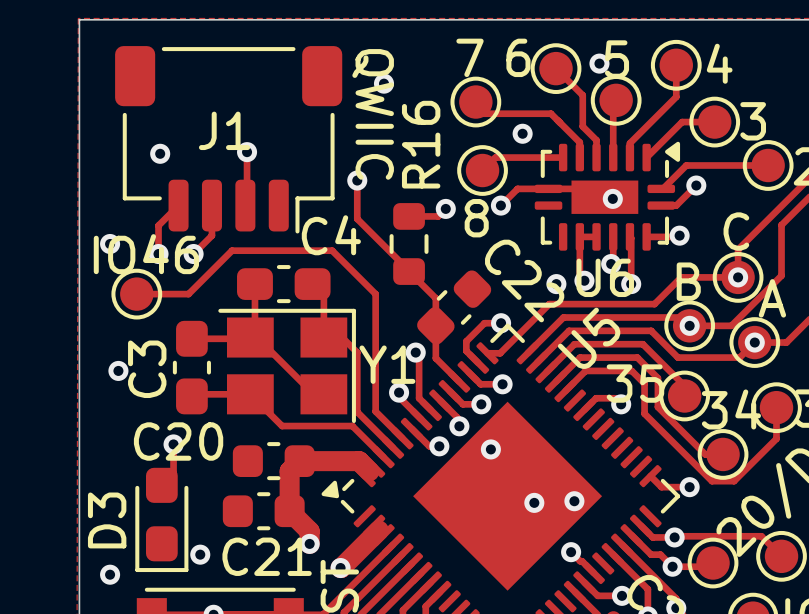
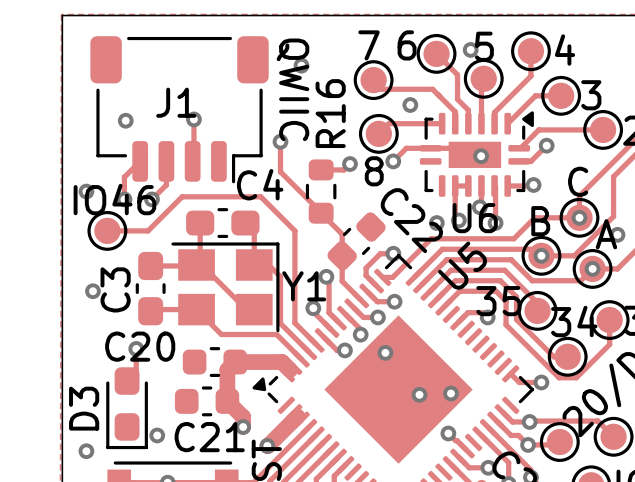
via: none -> (617, 234)

